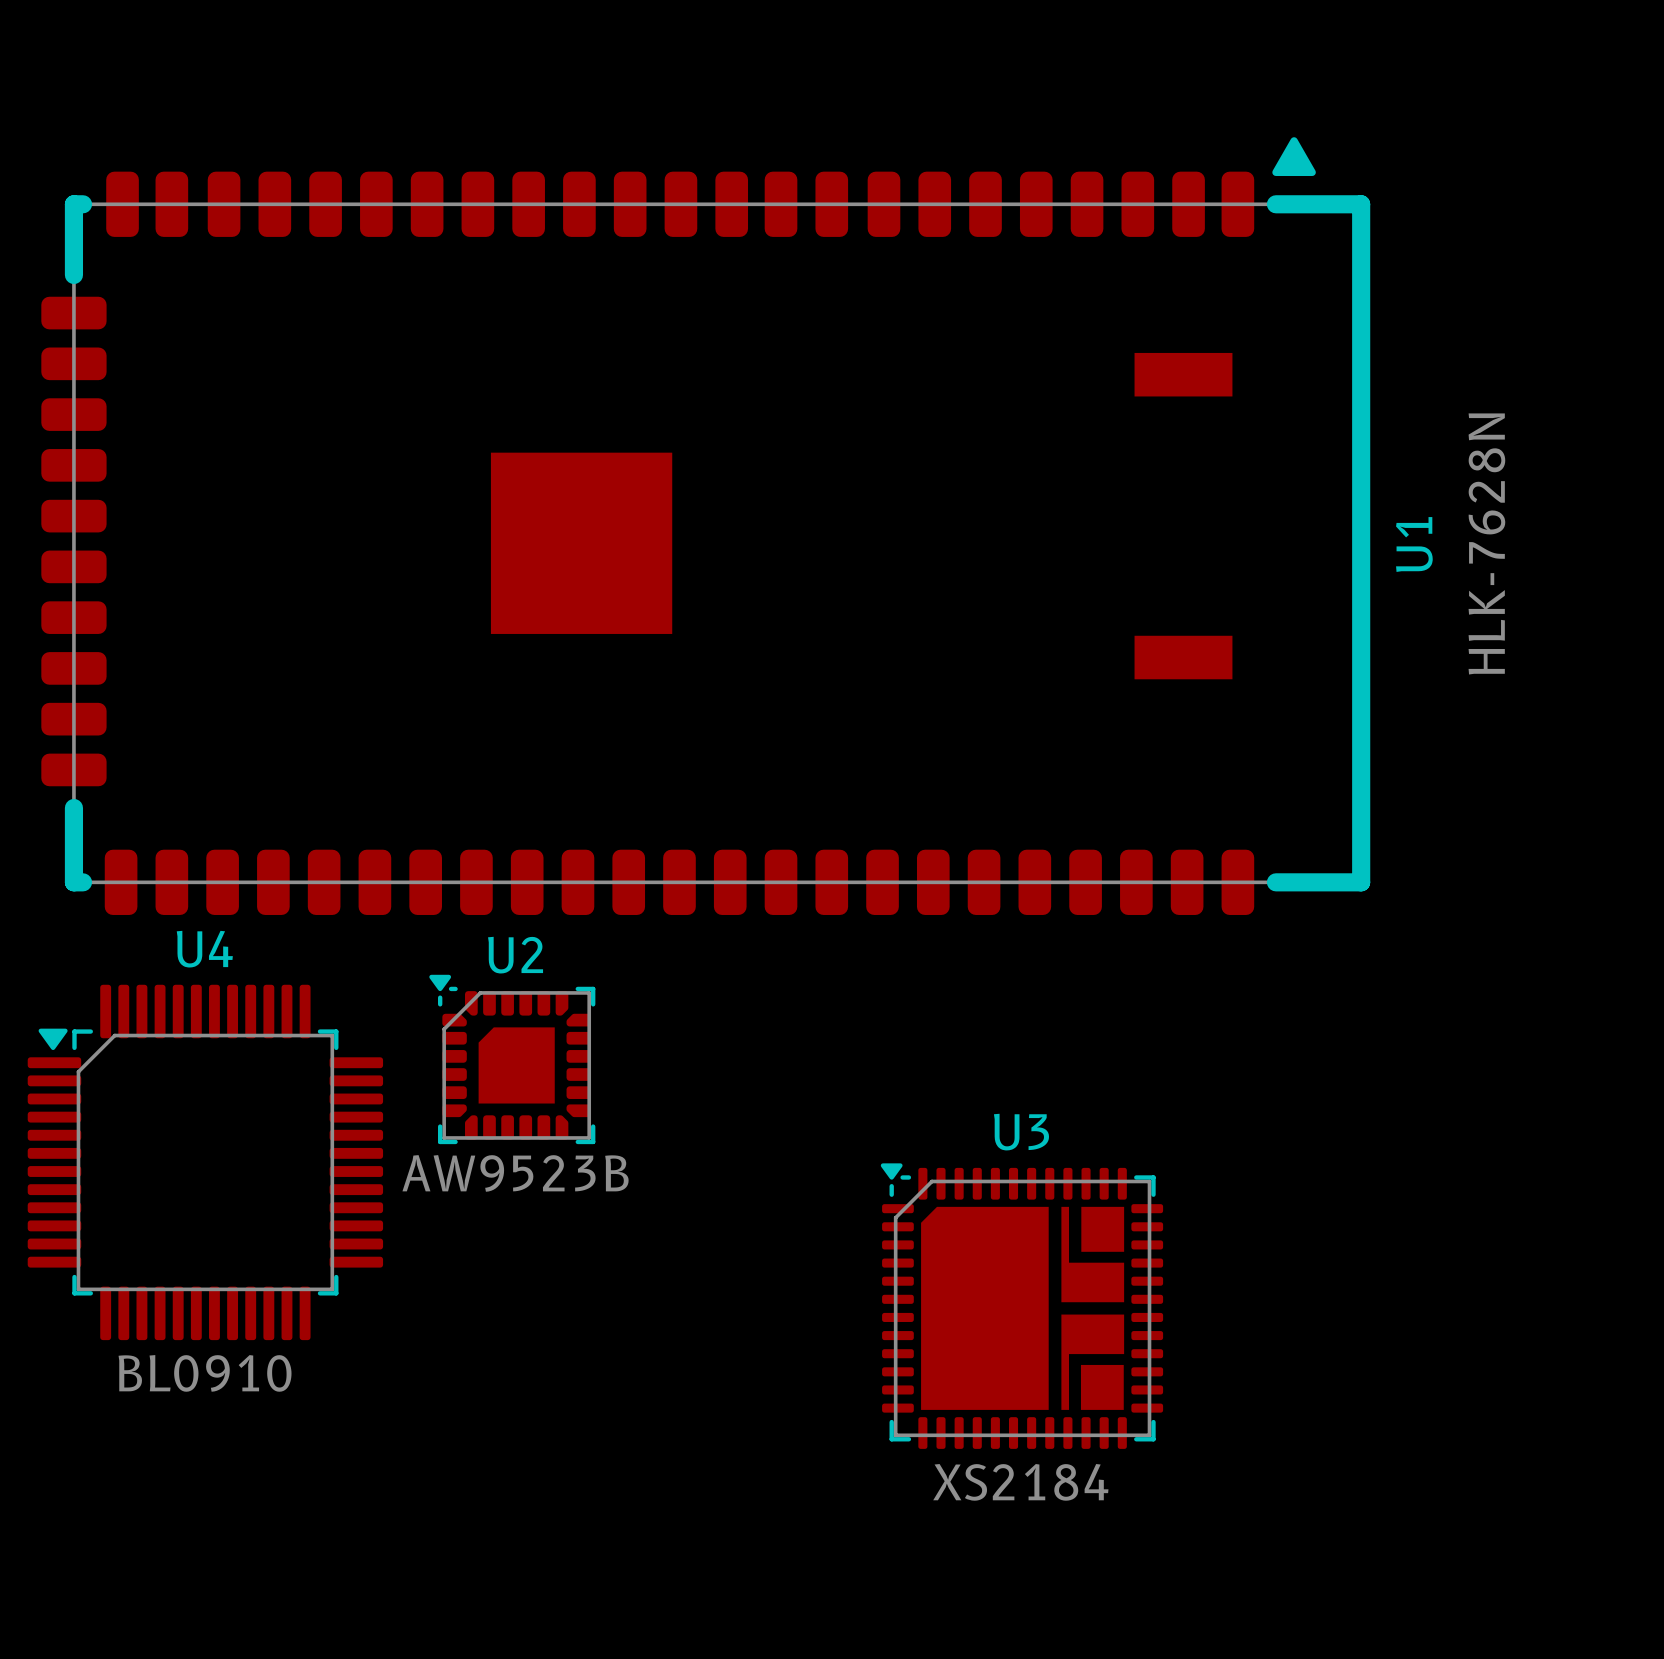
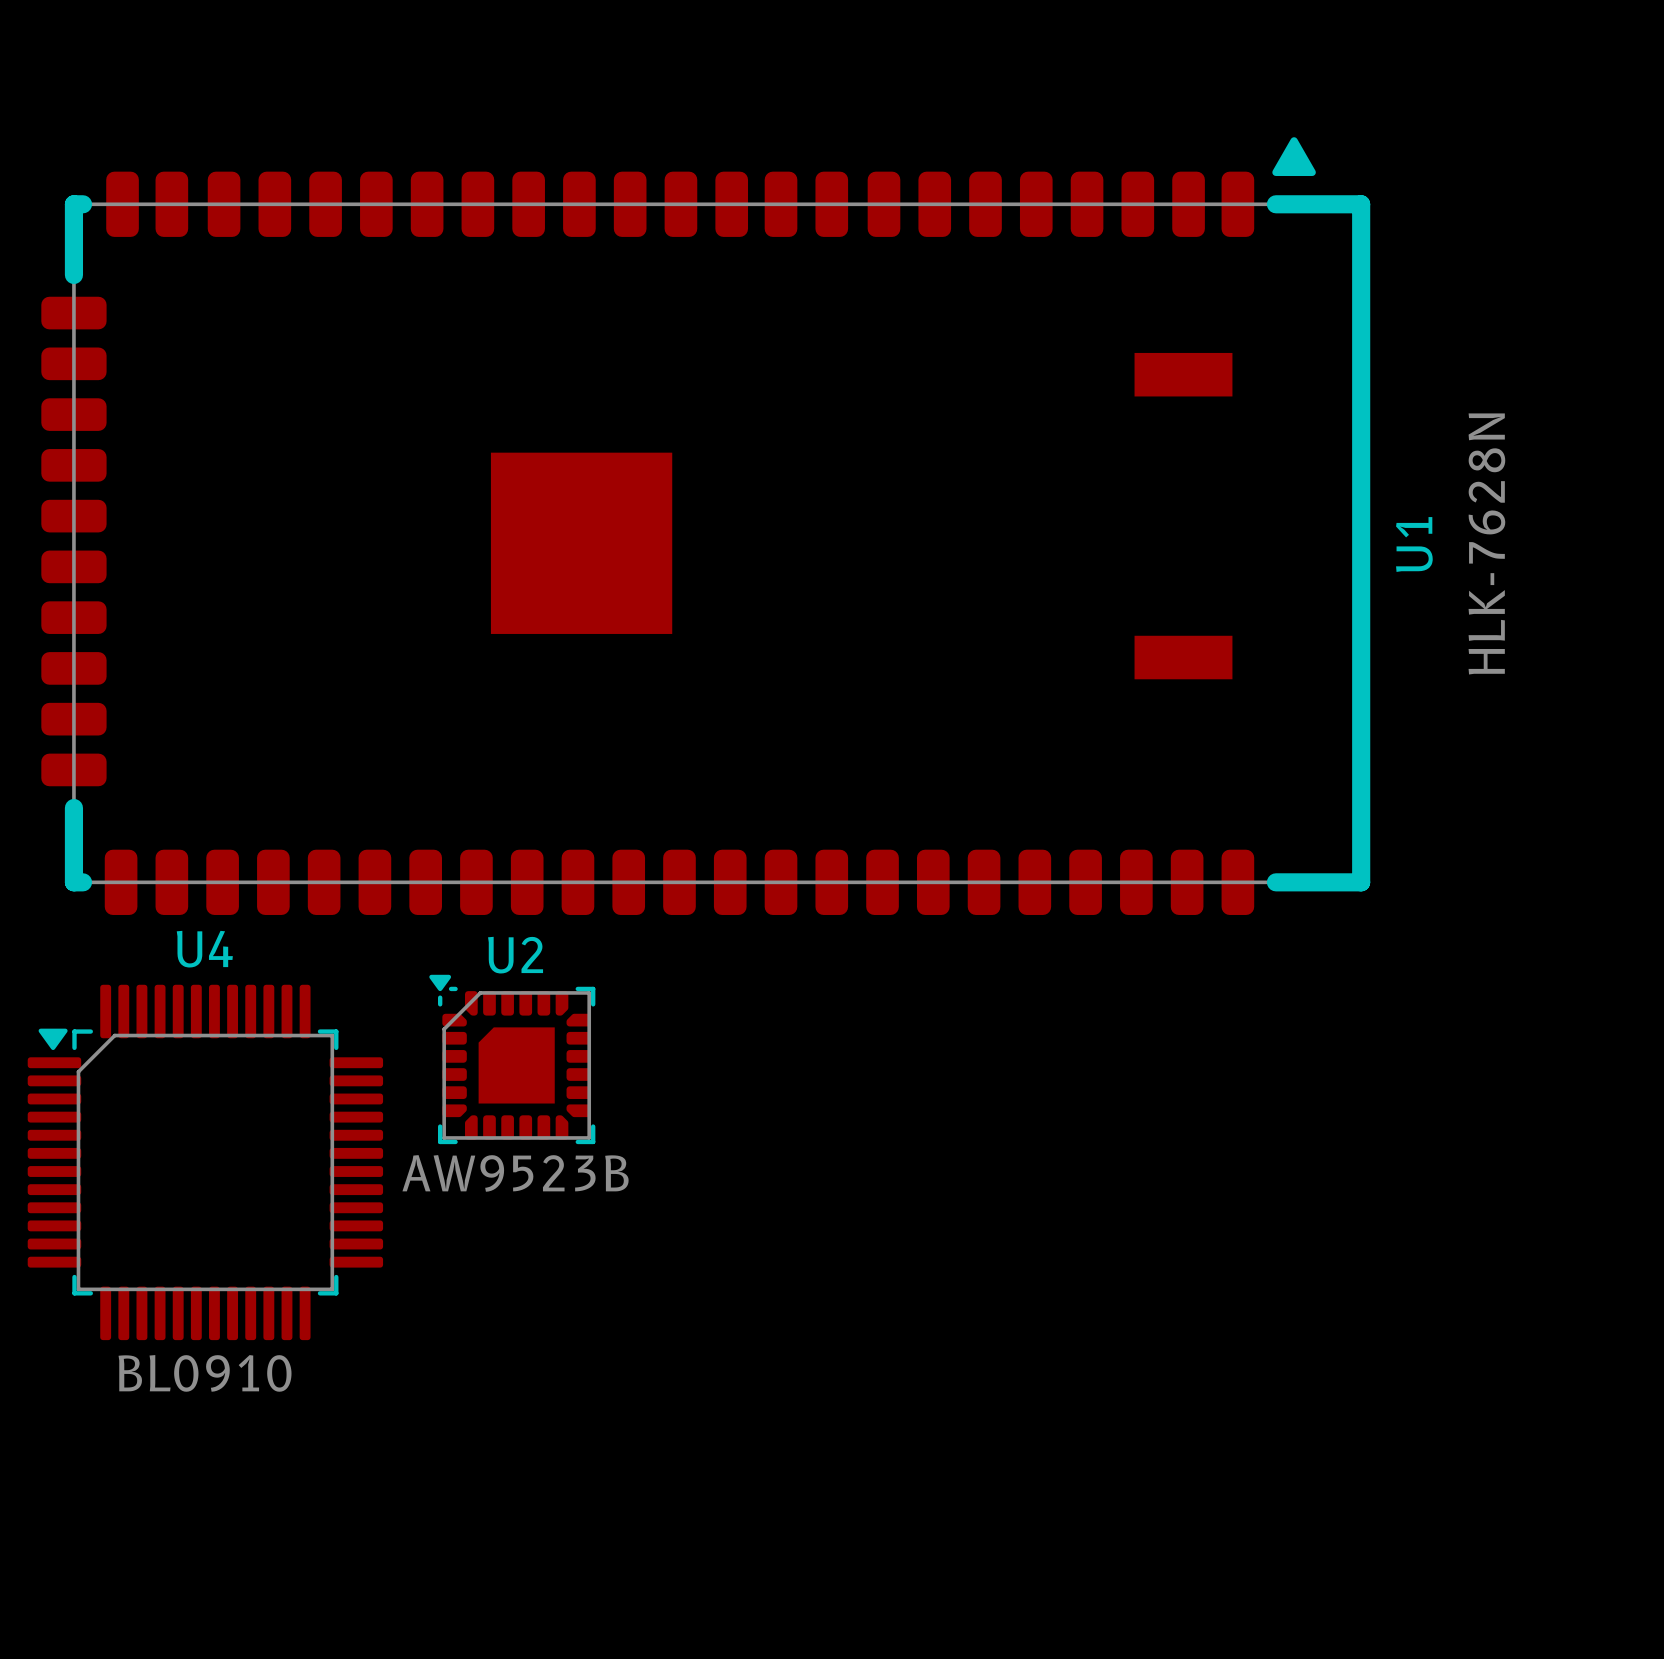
U3: XS2184 (1021, 1306) -> none

